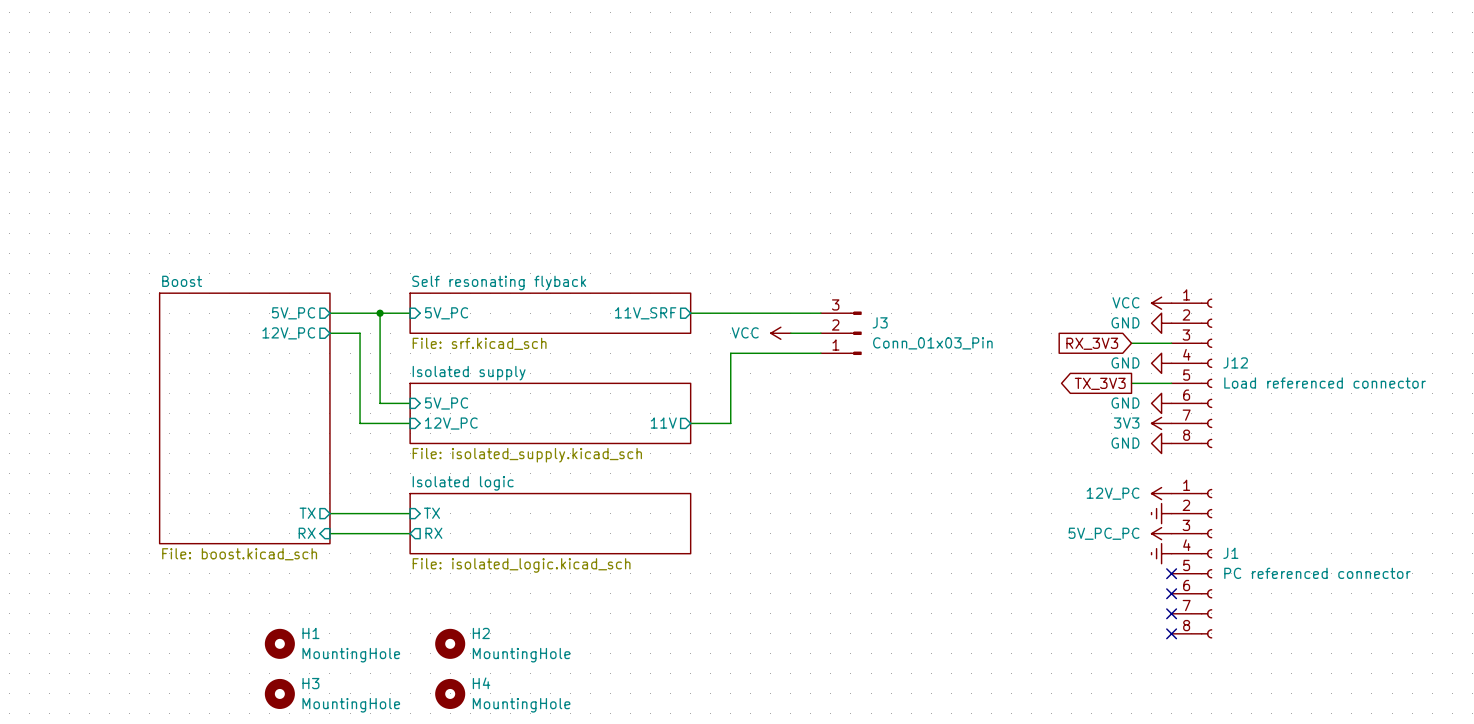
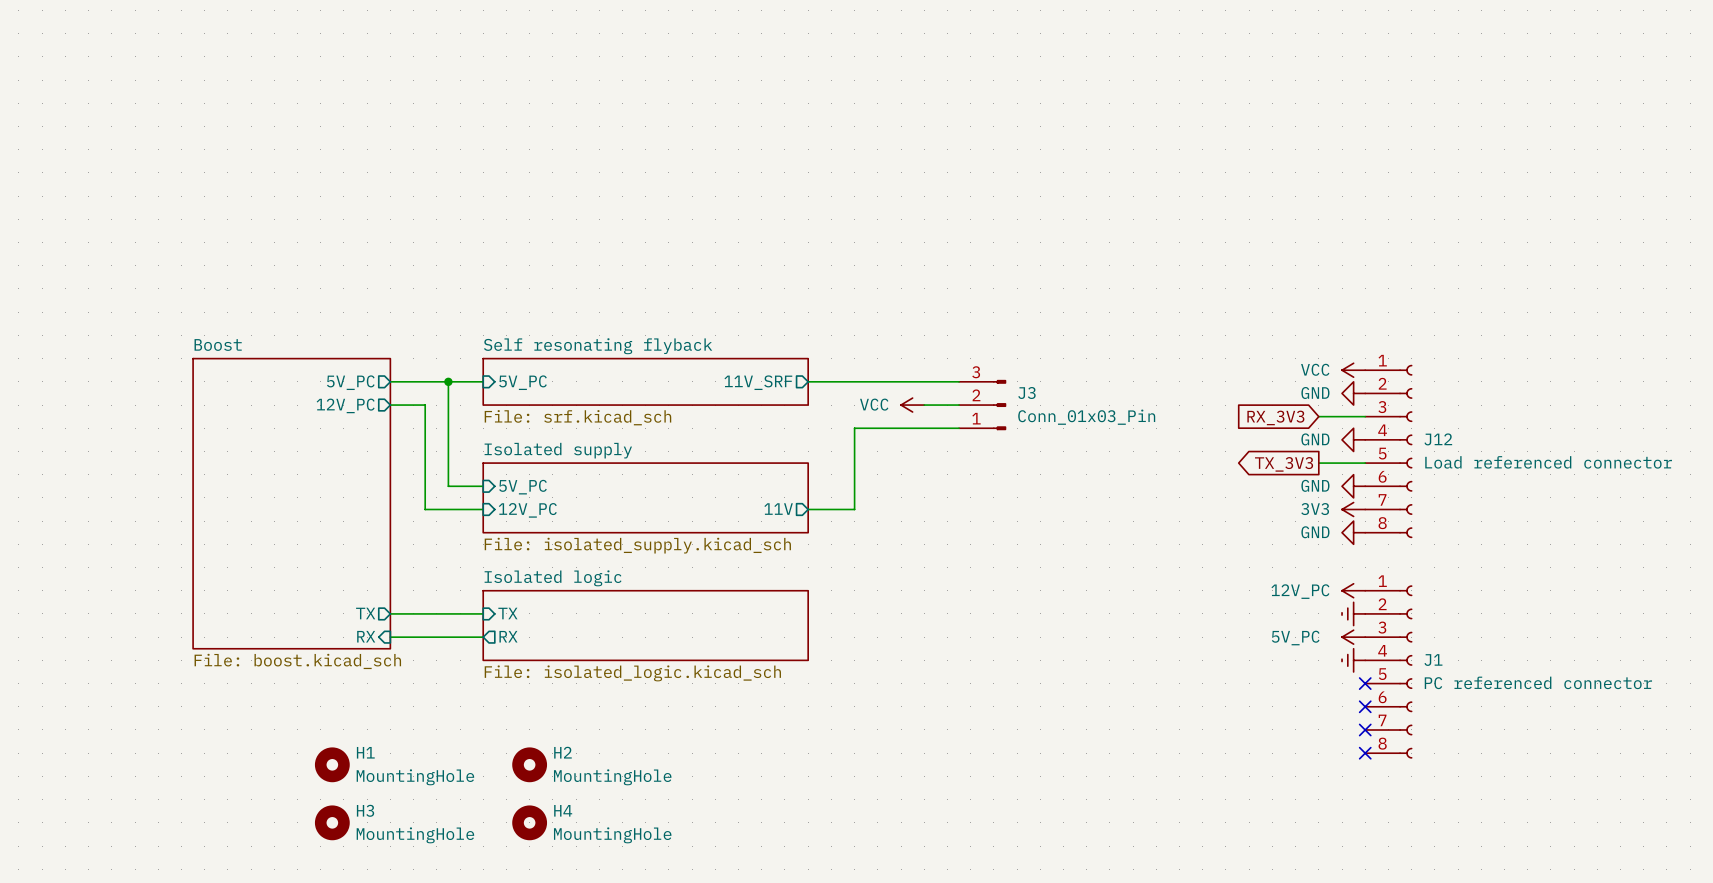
power symbol: 5V_PC_PC (1161, 533) -> 5V_PC (1353, 637)

